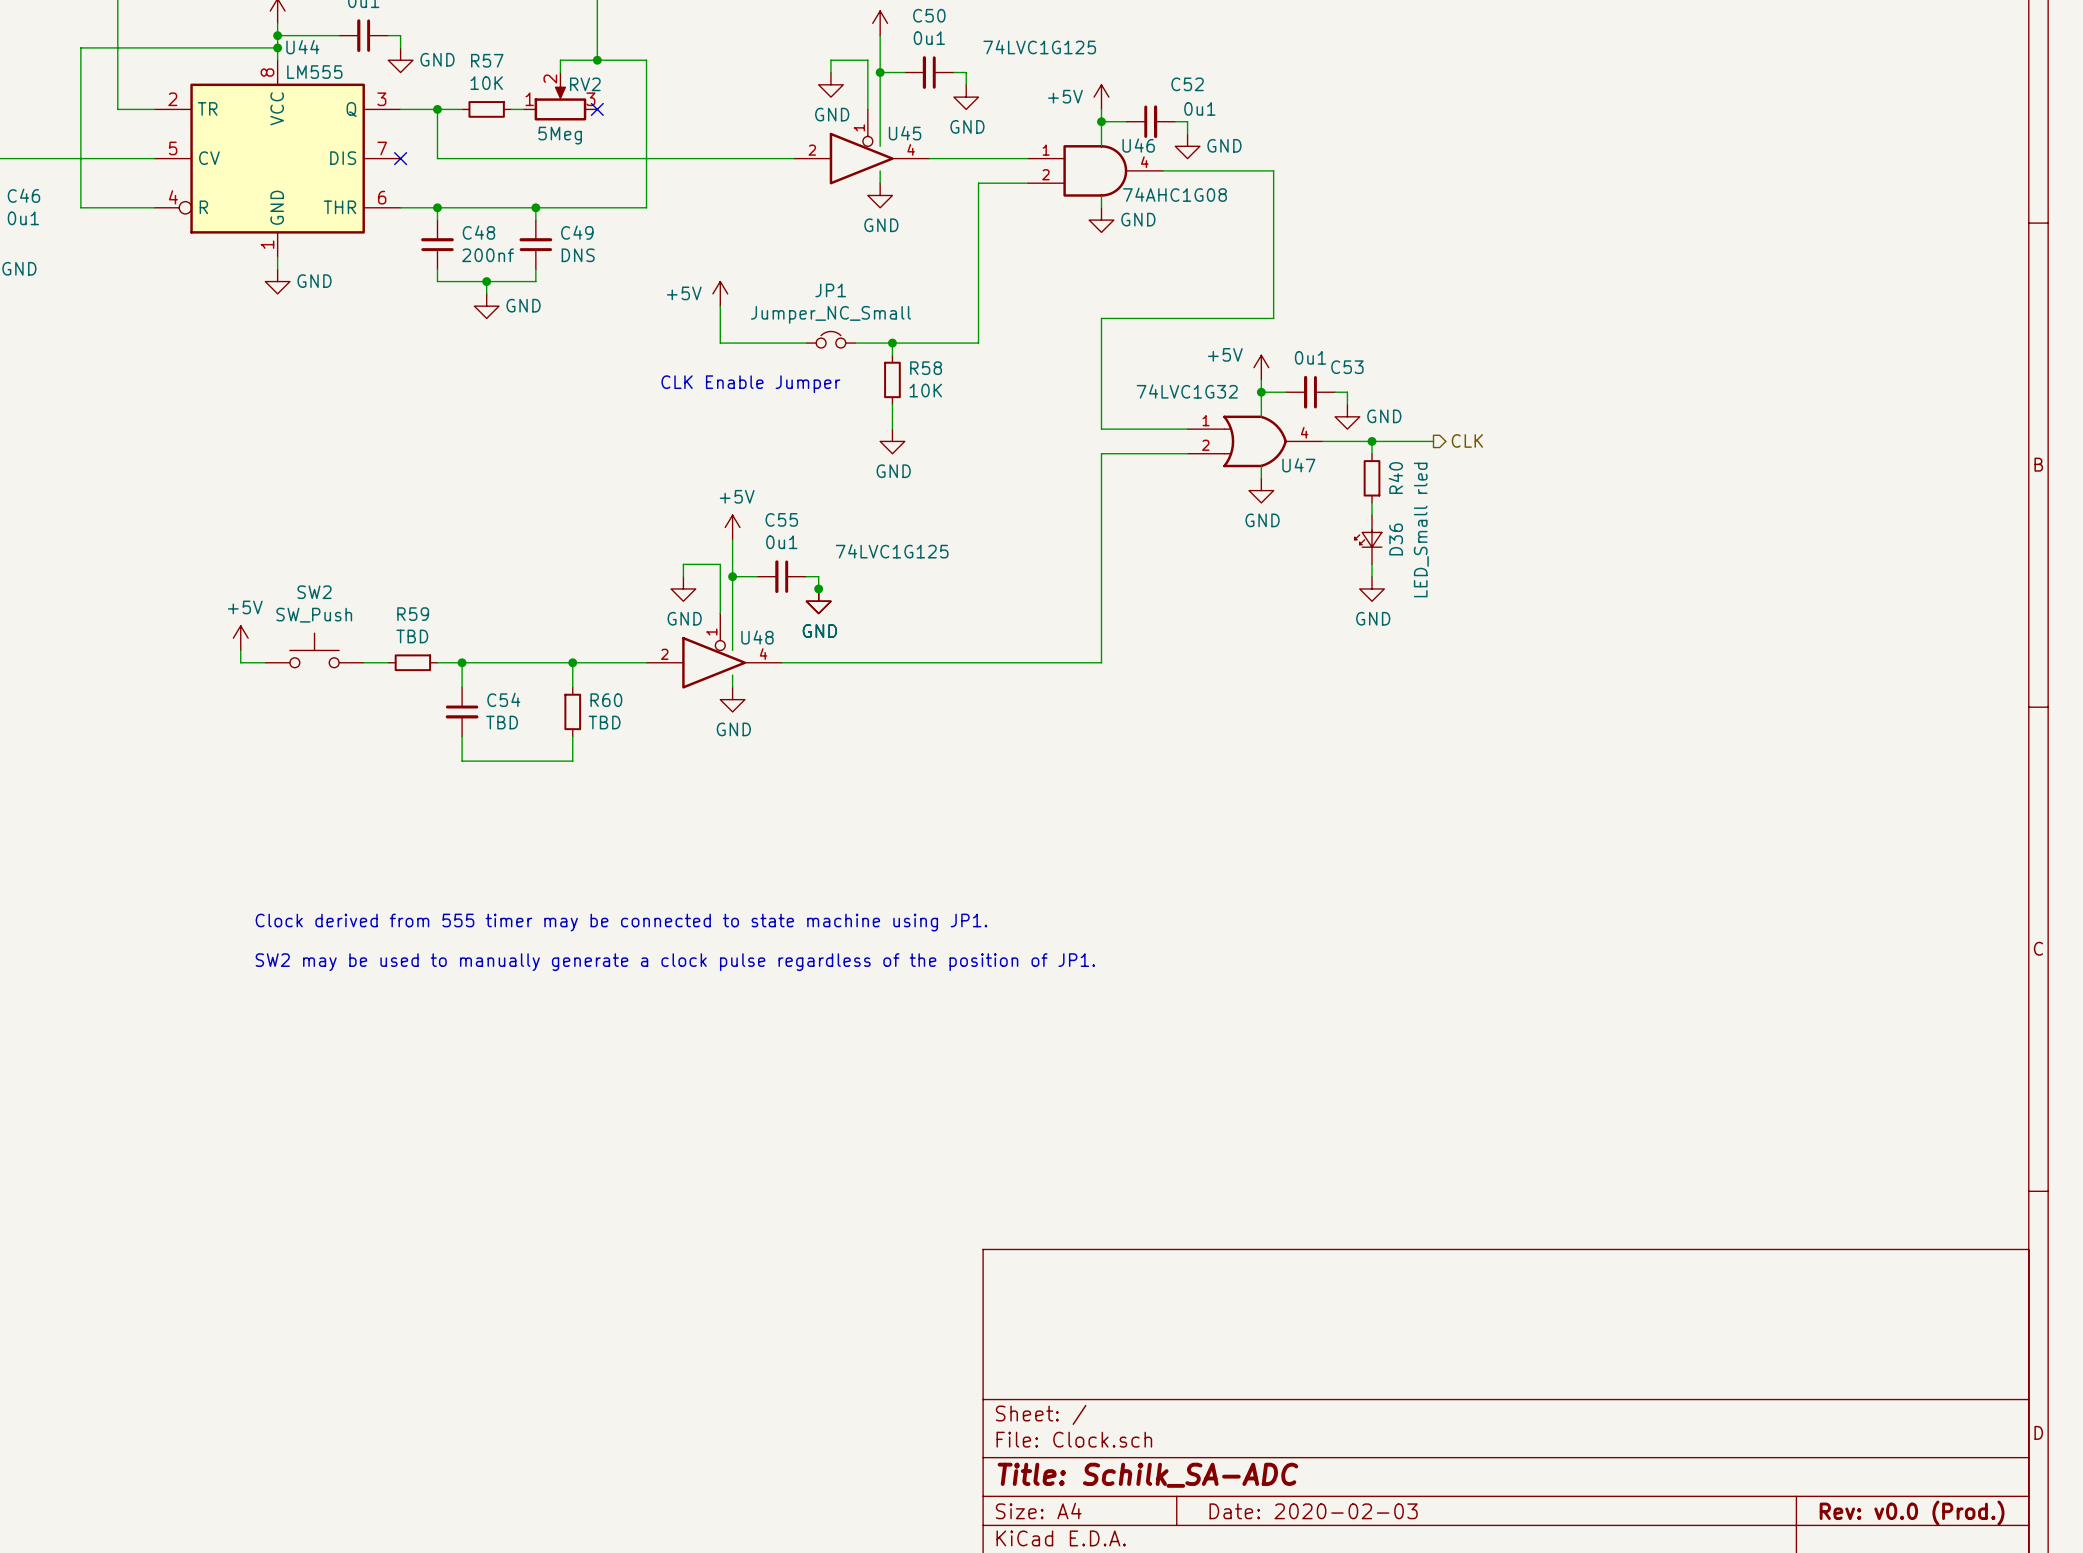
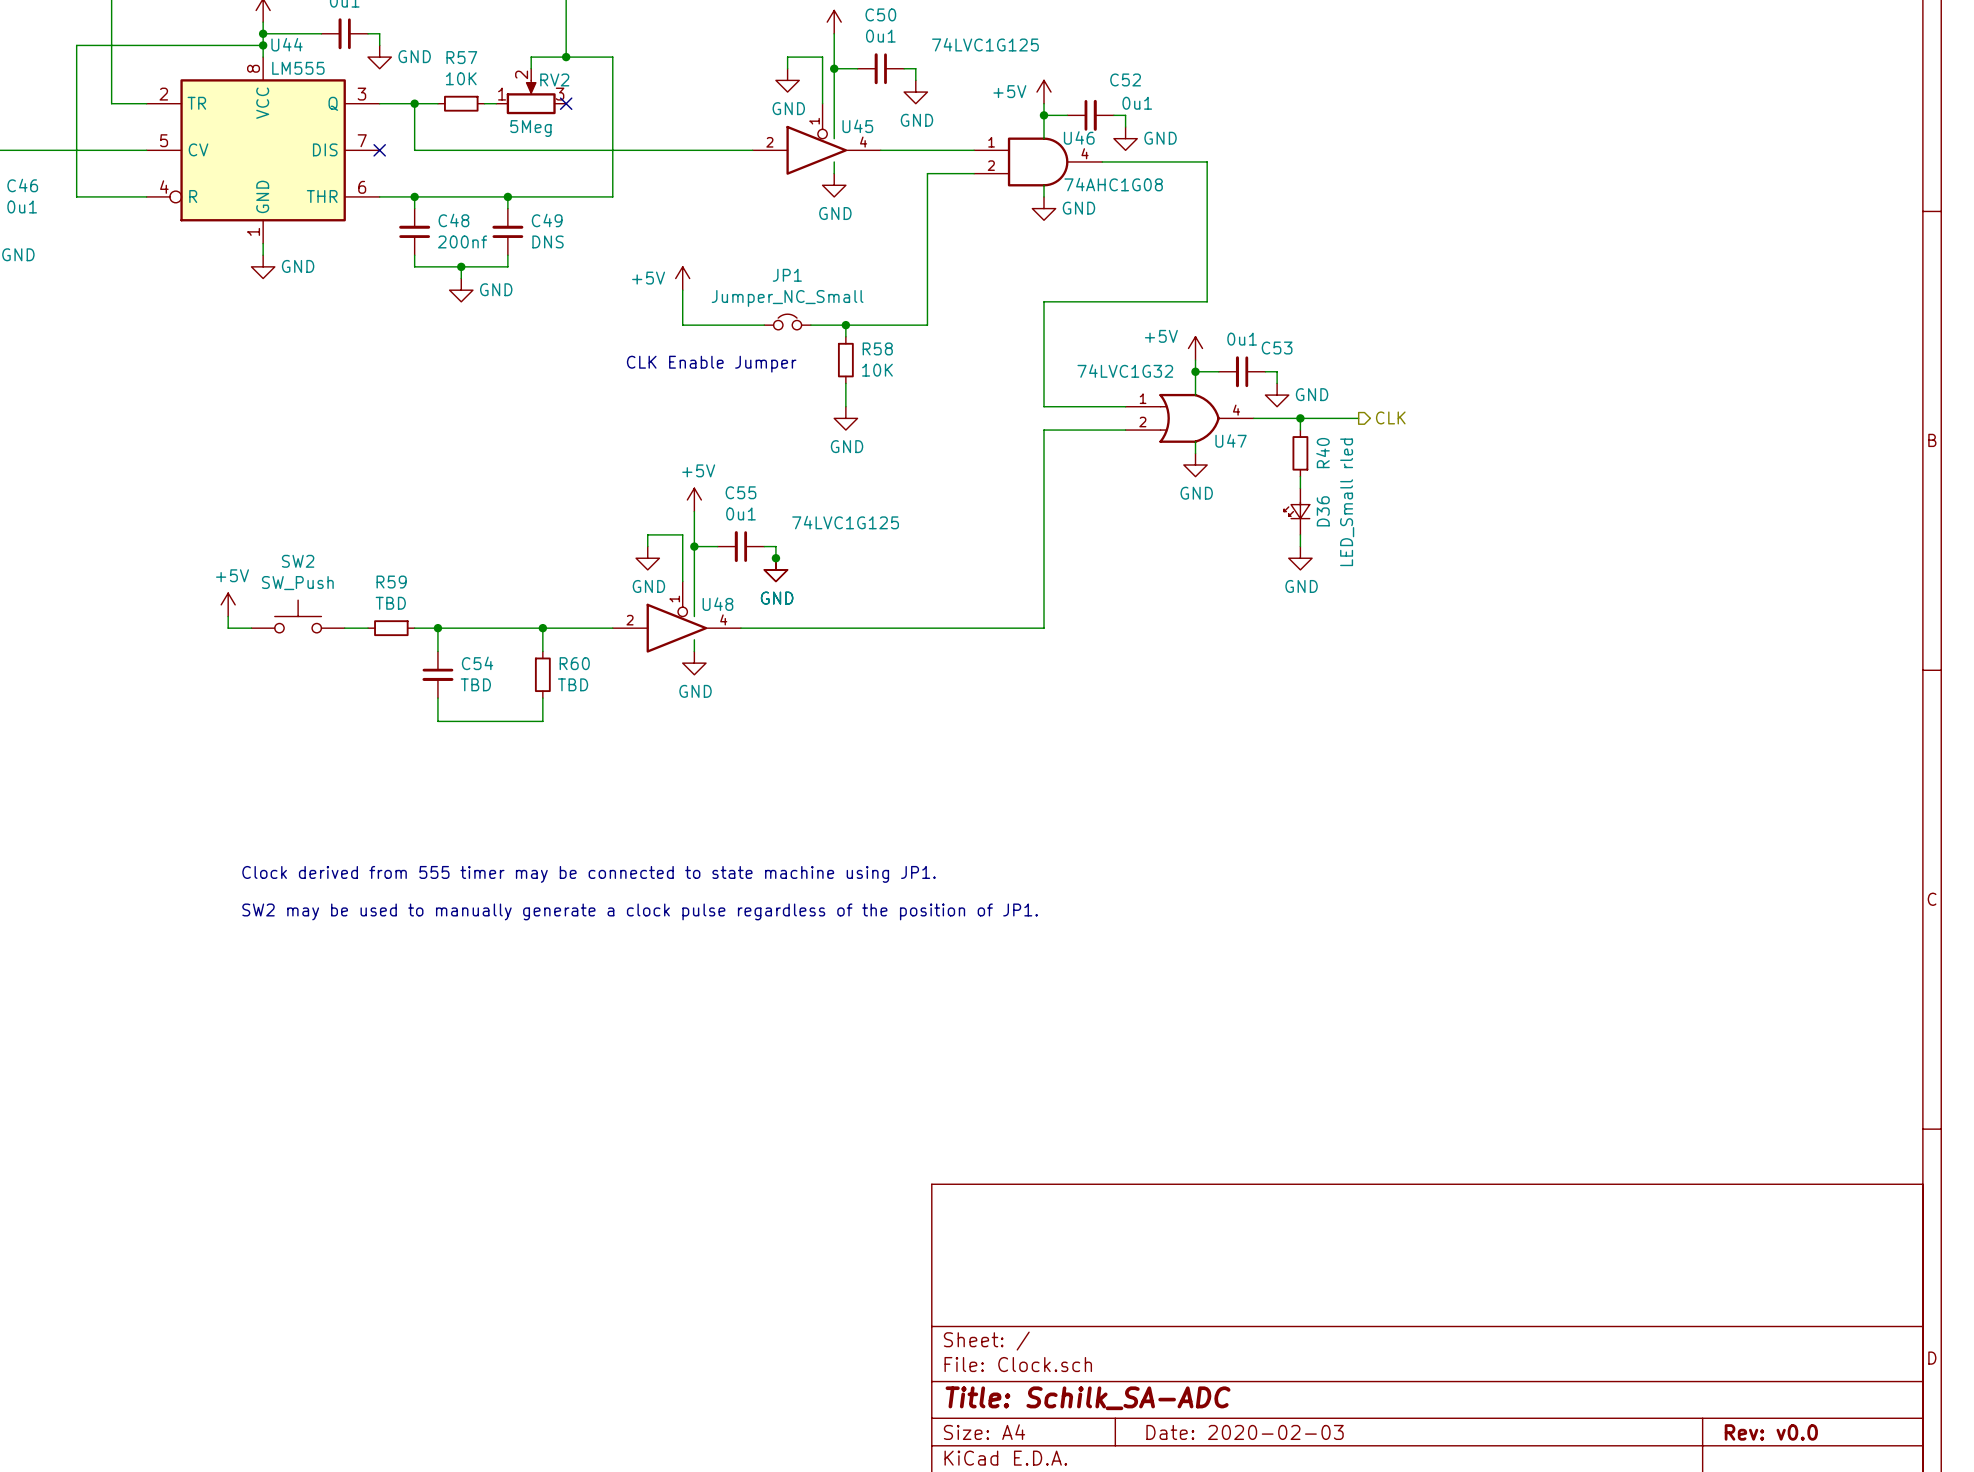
title block: Rev: v0.0 (Prod.) (1912, 1513) -> Rev: v0.0 (1771, 1432)

